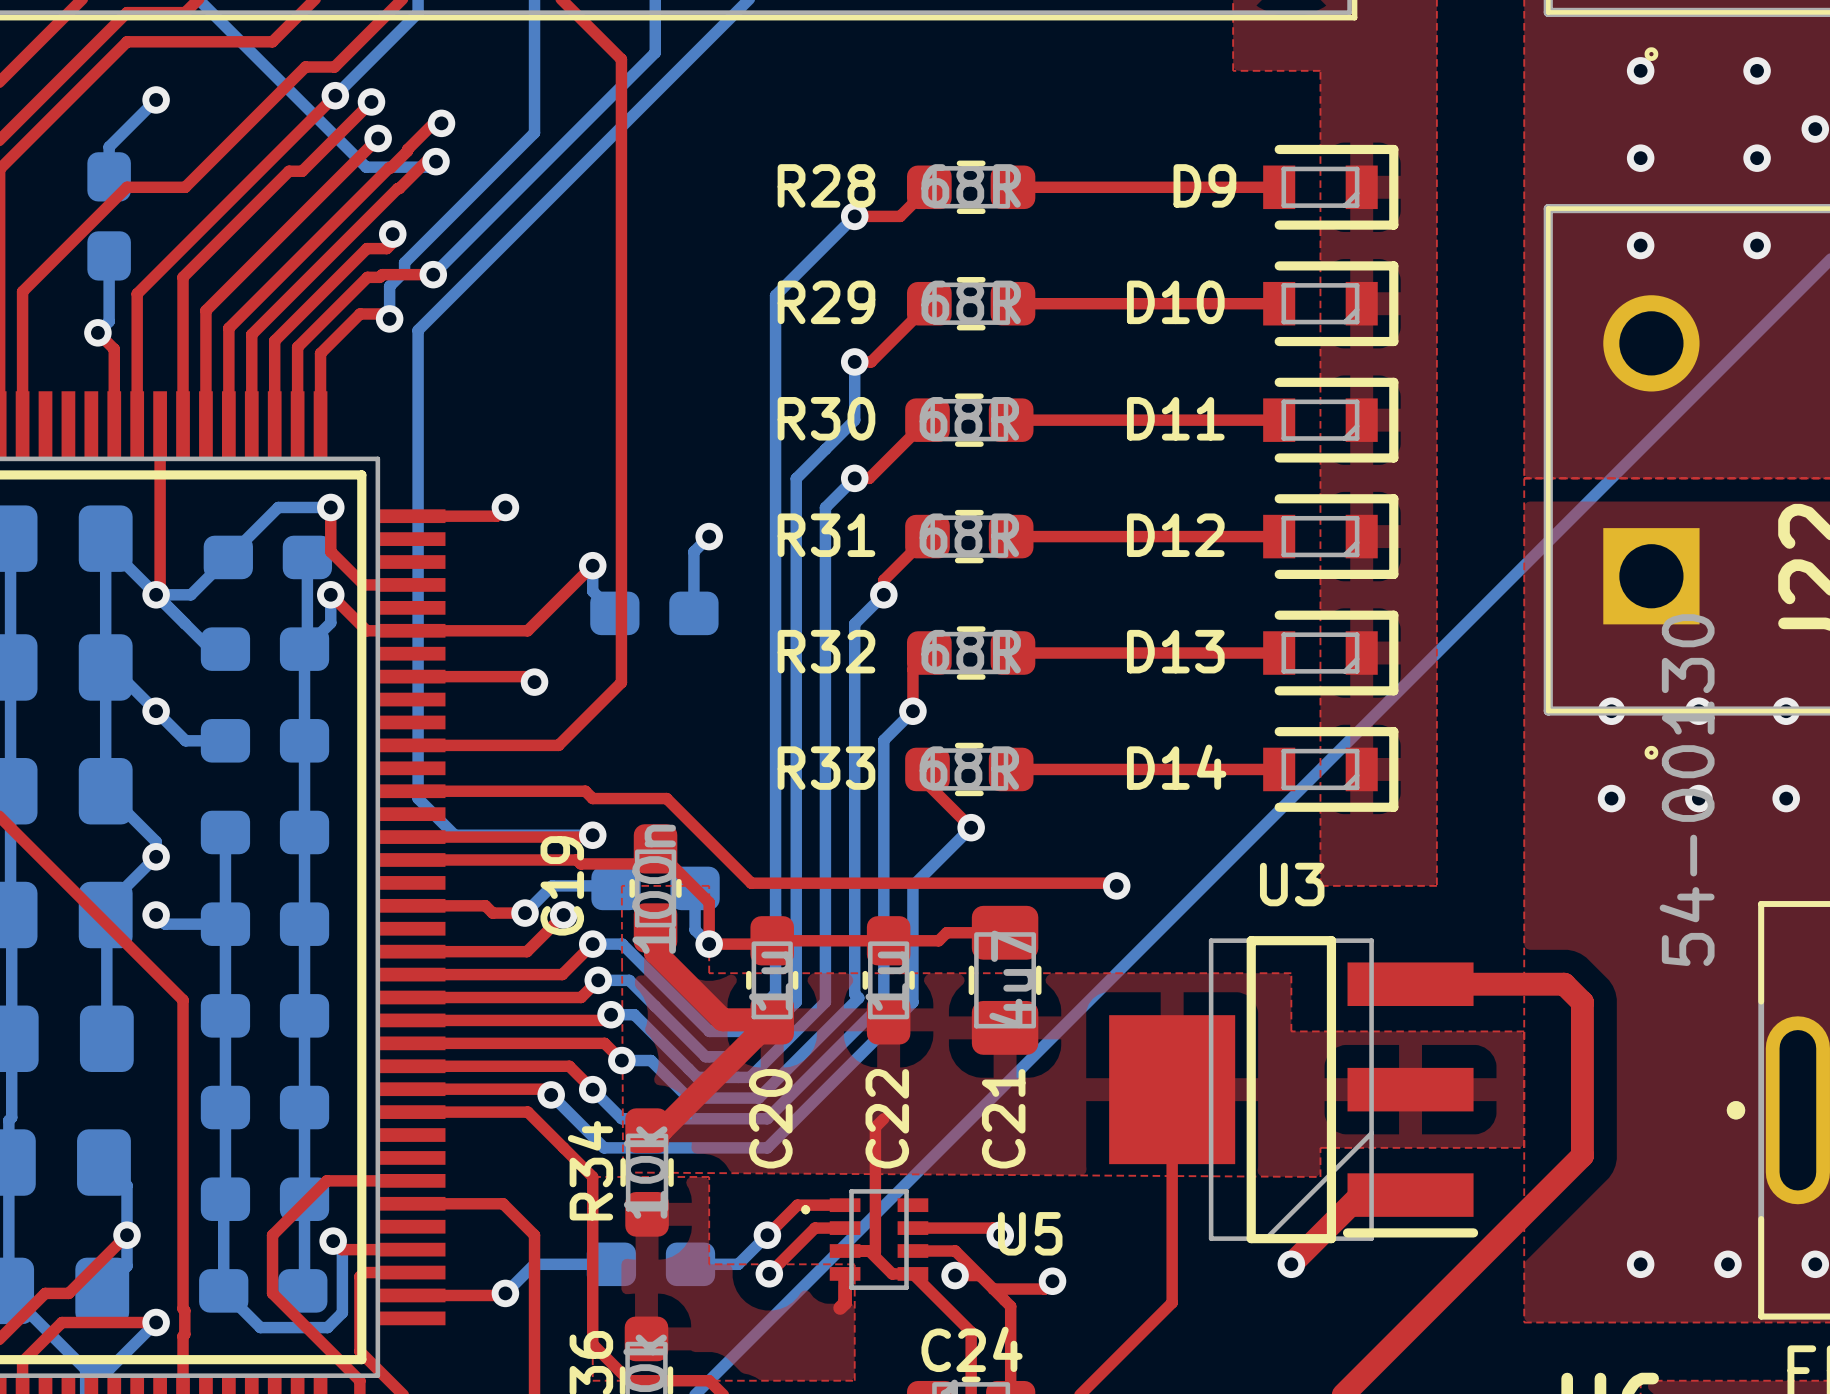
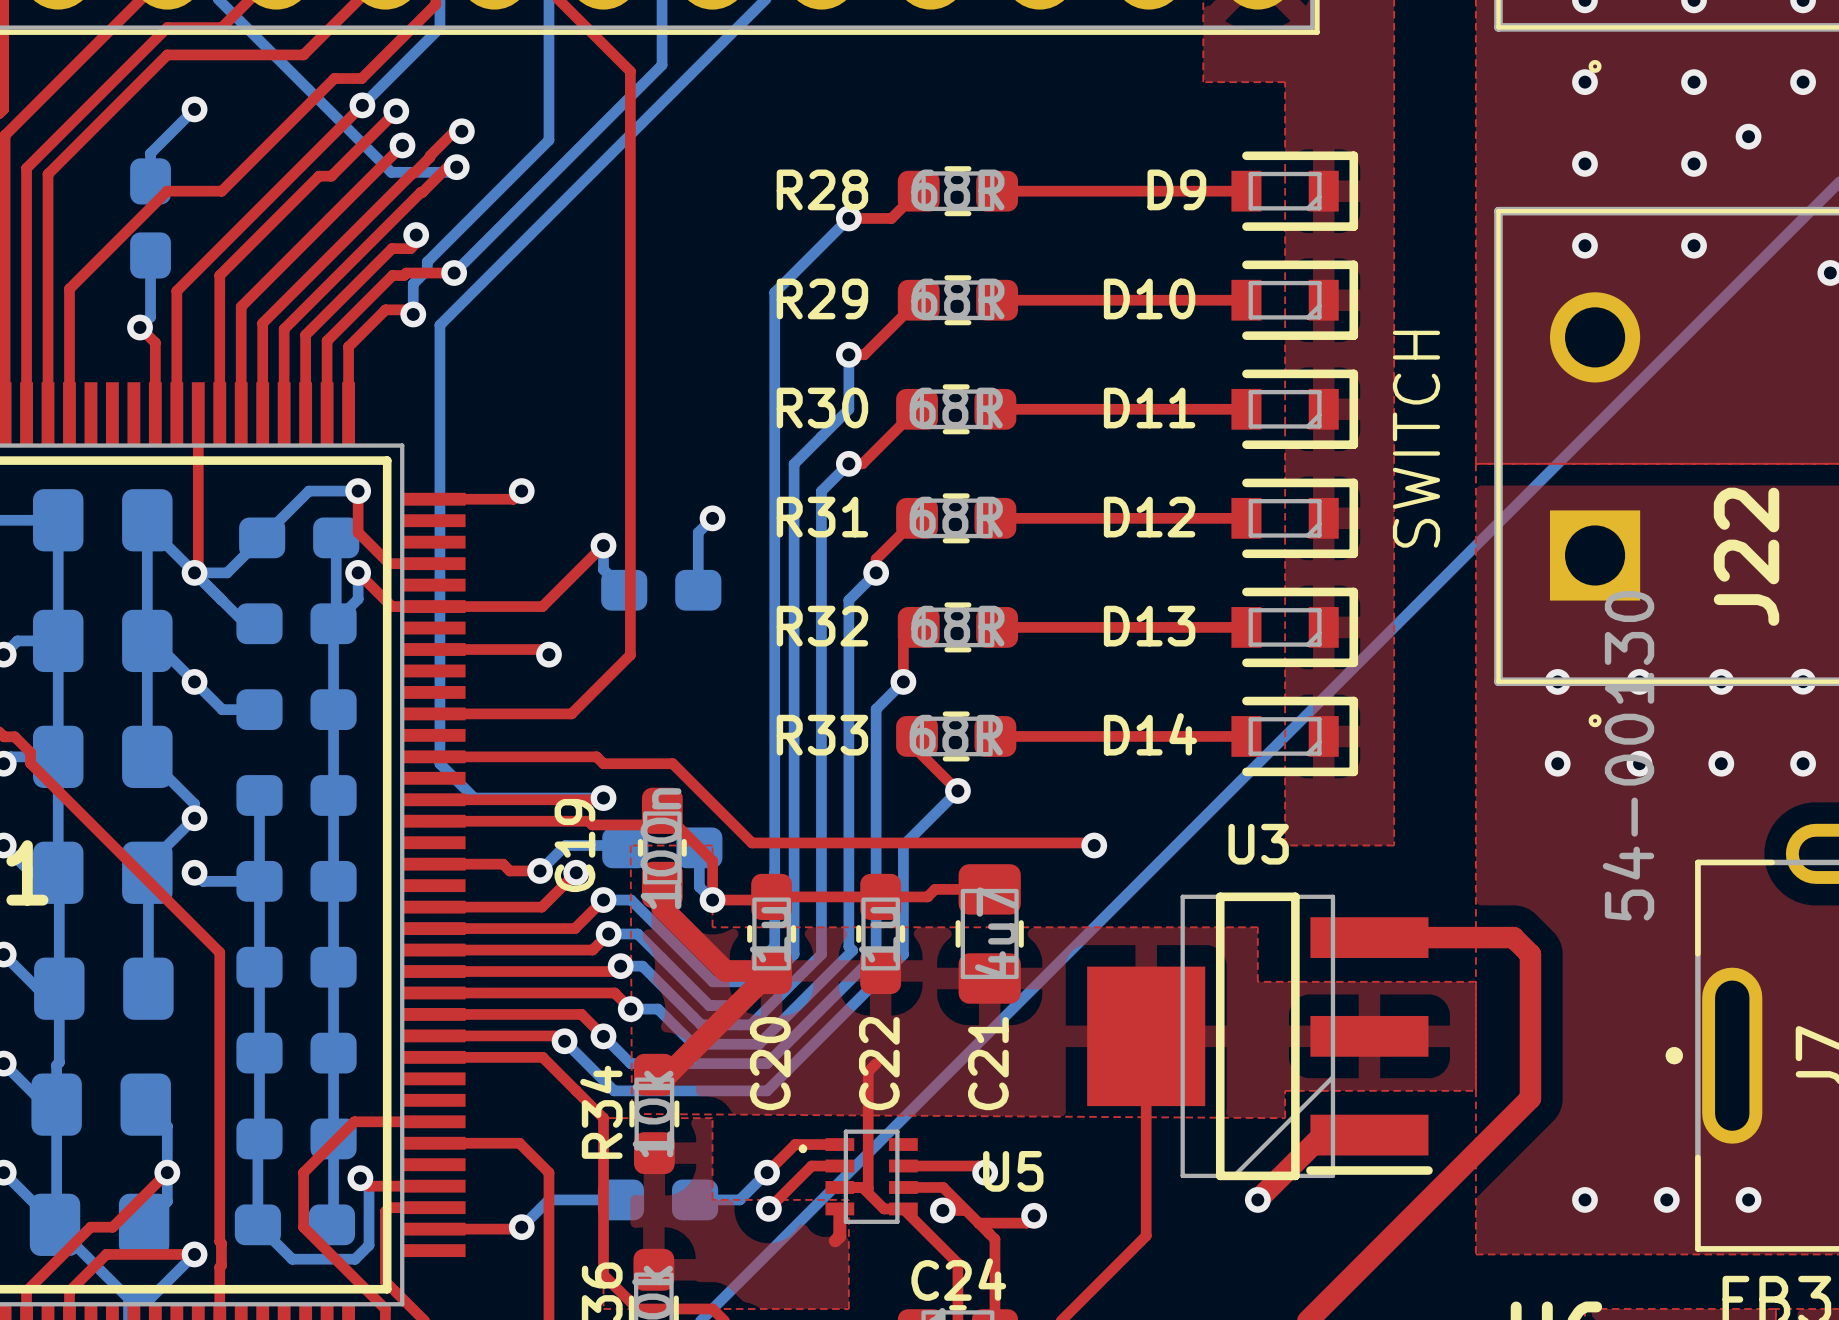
text: none -> SWITCH (1416, 439)

